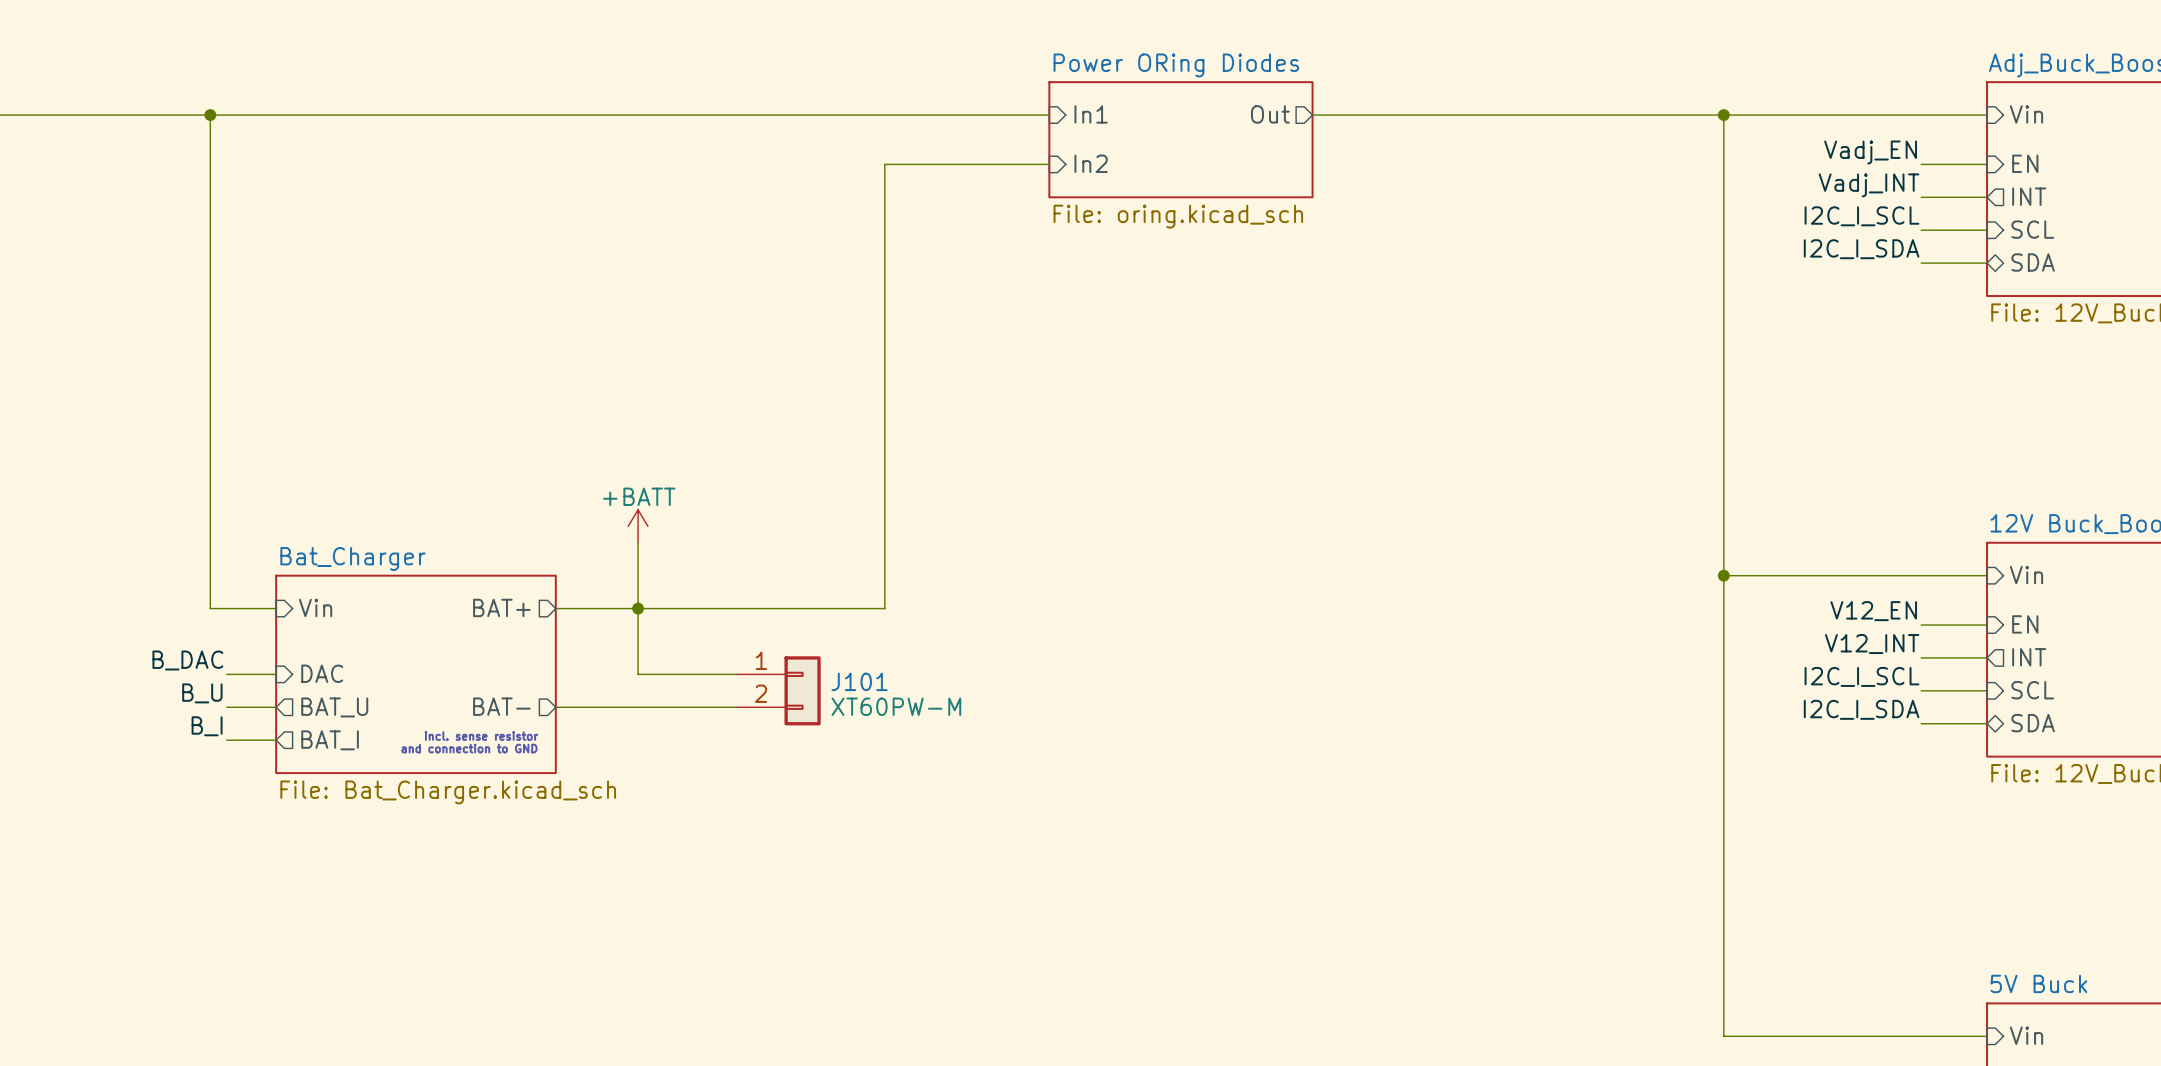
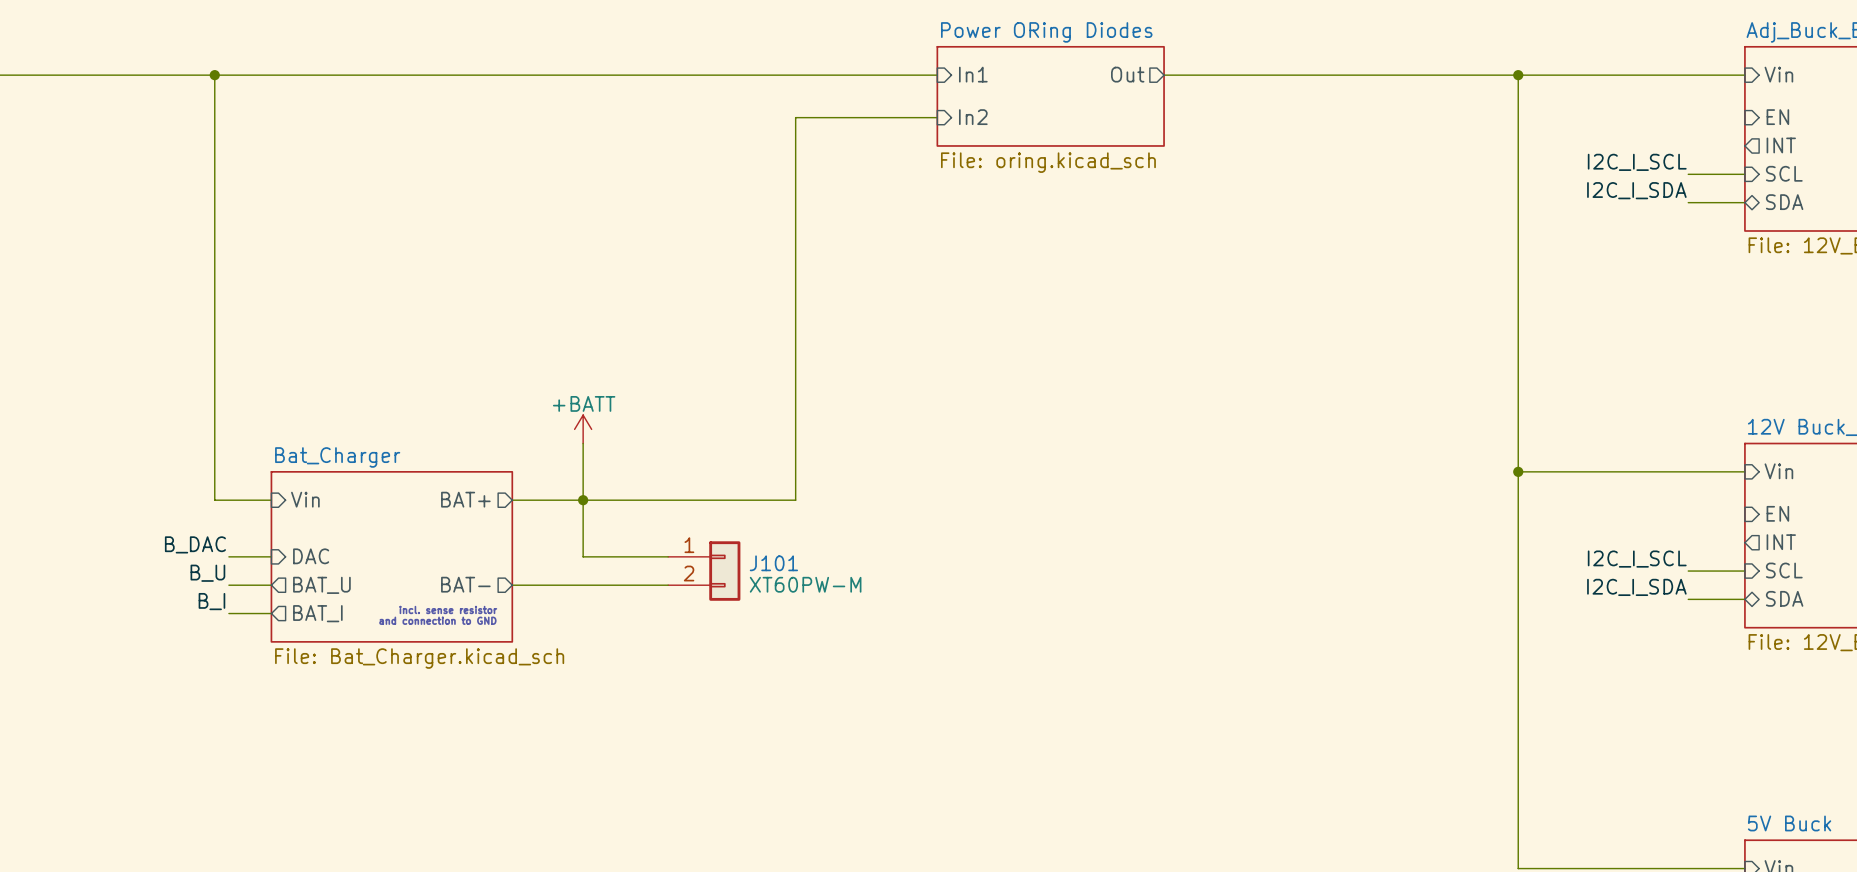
label: Vadj_EN (1870, 152) -> none
wire: (1921, 164) (1987, 164) -> none
label: Vadj_INT (1869, 185) -> none
wire: (1921, 197) (1987, 197) -> none
label: V12_EN (1873, 611) -> none
wire: (1921, 625) (1987, 625) -> none
label: V12_INT (1872, 644) -> none
wire: (1921, 657) (1987, 657) -> none

